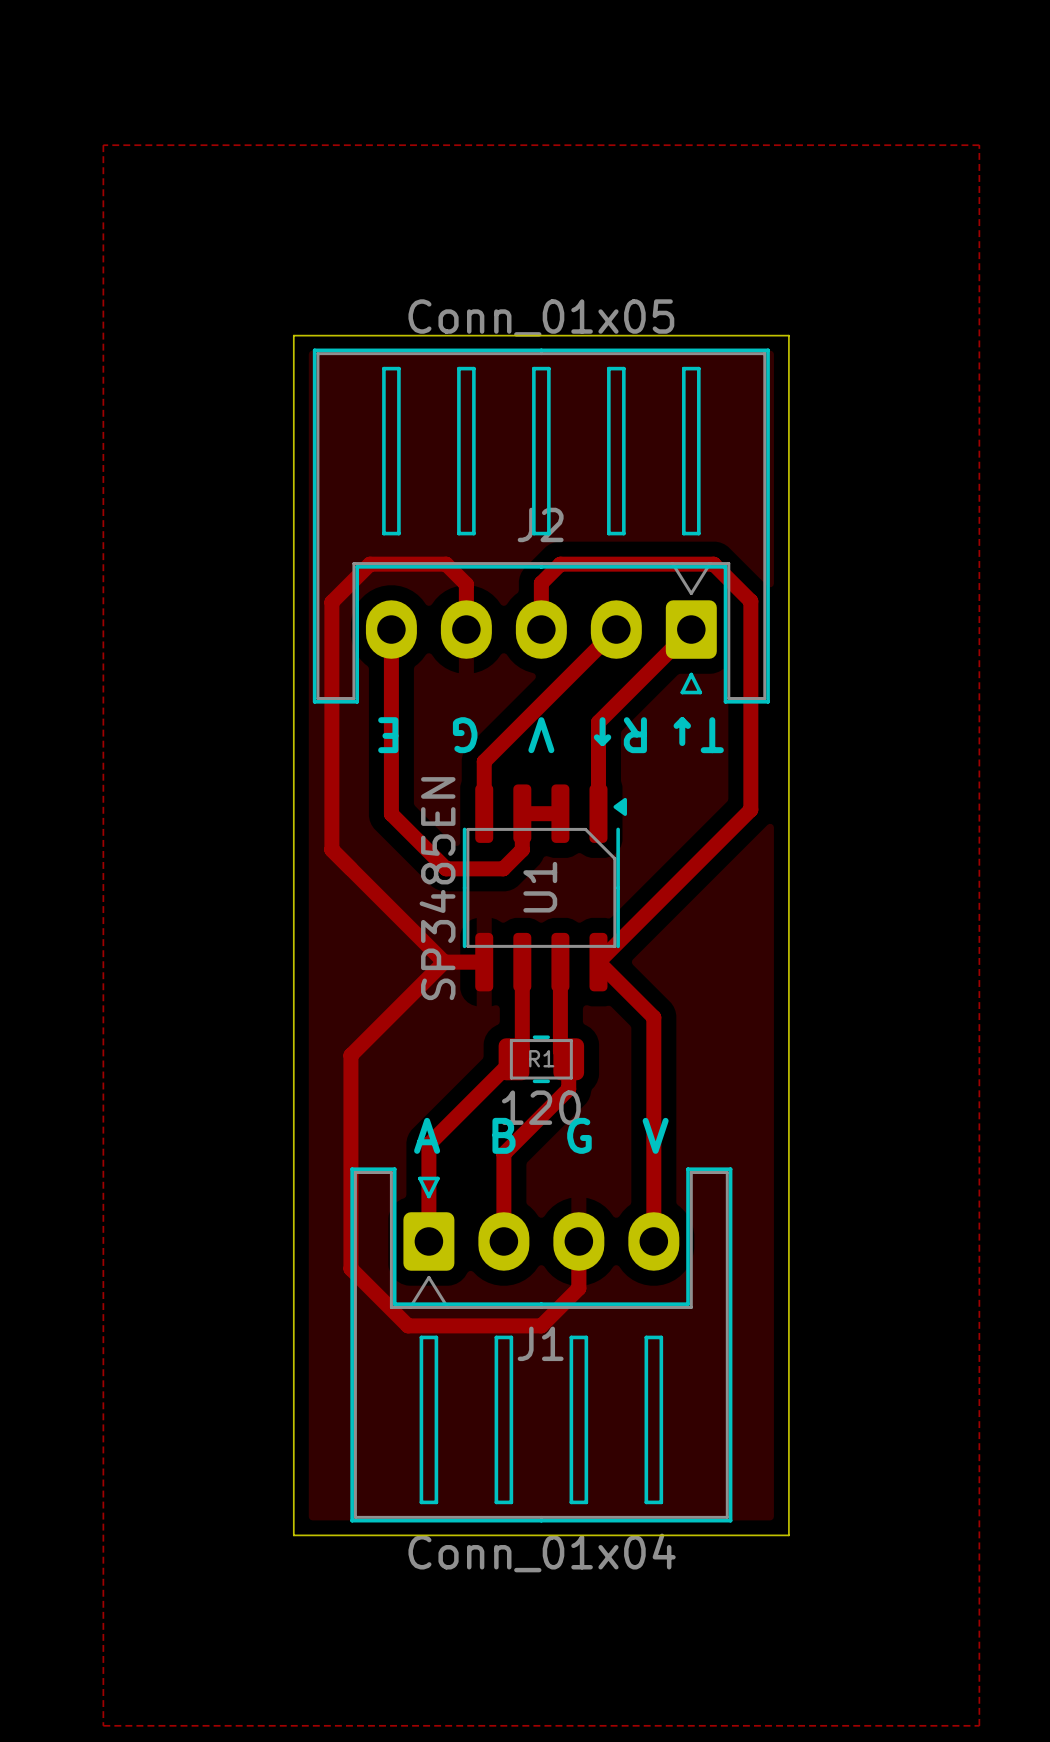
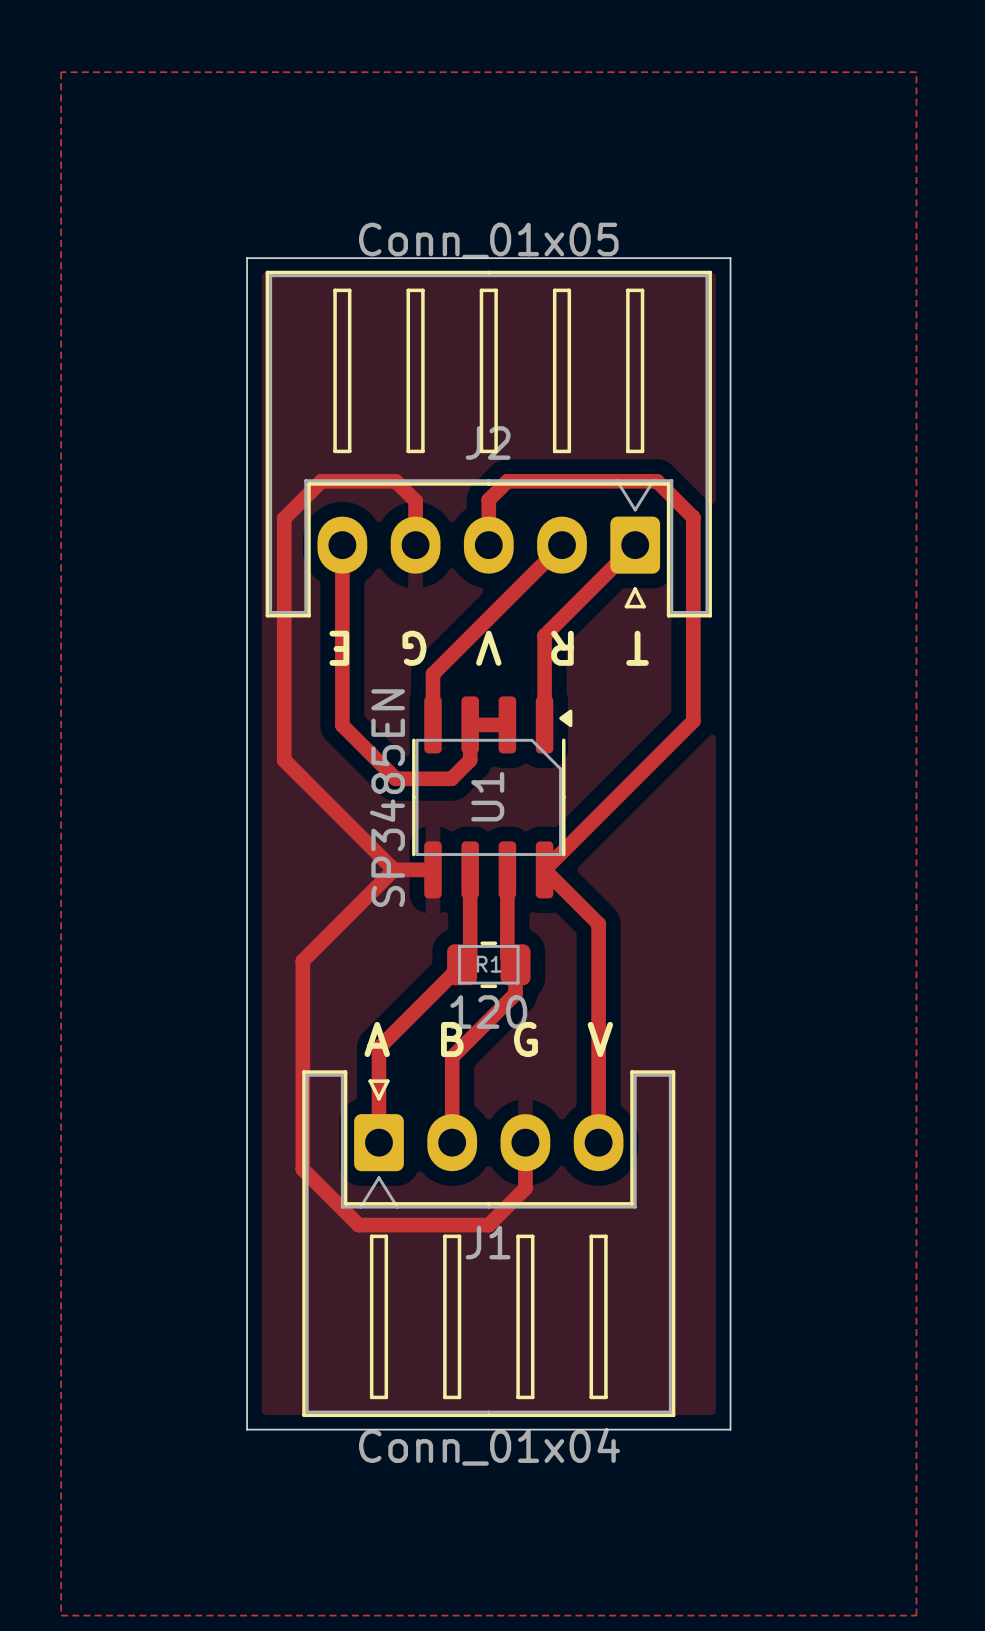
text: R↑ (620, 735) -> R (562, 648)
text: T↓ (698, 735) -> T (637, 648)

